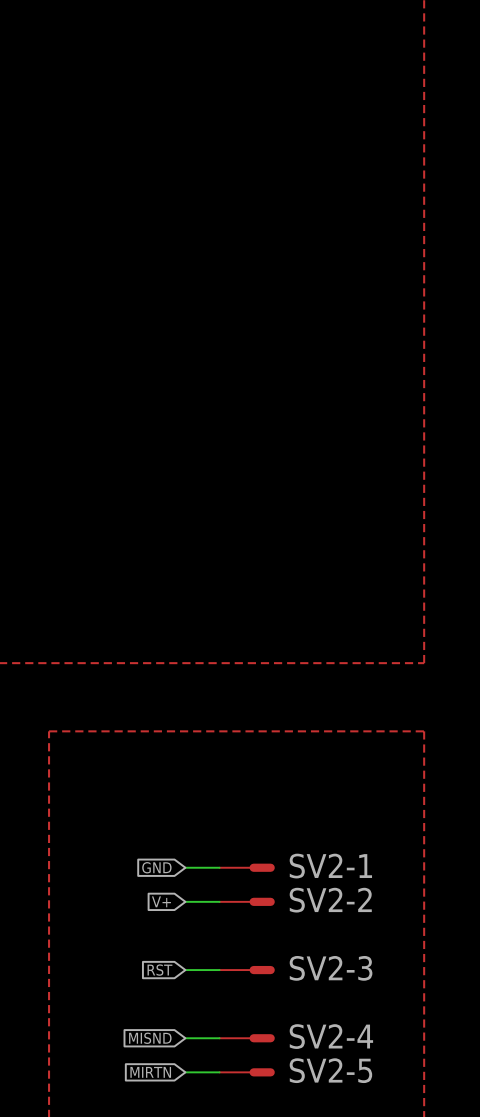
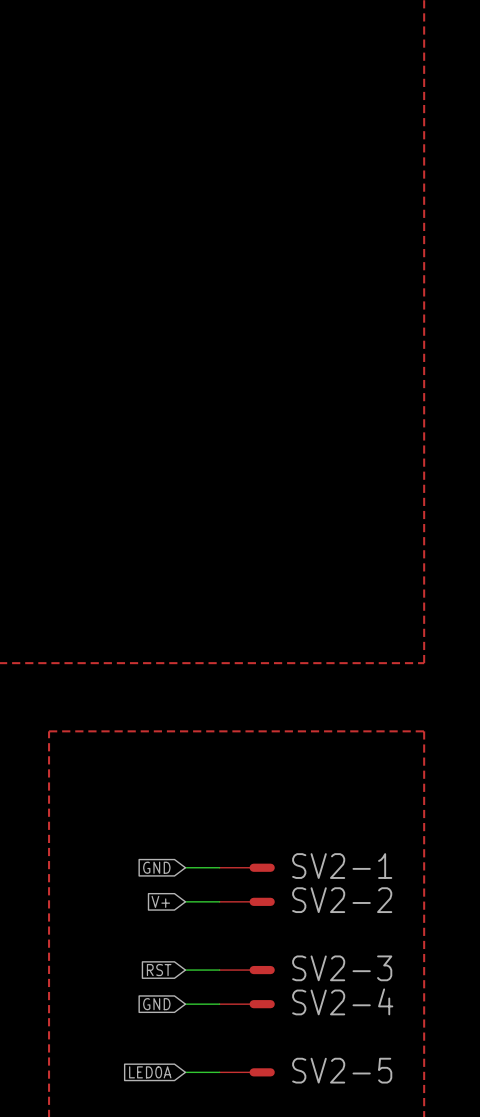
global label: none -> GND (156, 1004)
global label: MISND (150, 1038) -> none
wire: (185, 1038) (219, 1038) -> (185, 1004) (219, 1004)
SV2-4 position: (247, 1038) -> (247, 1004)
global label: MIRTN (150, 1072) -> LED0A (150, 1072)

